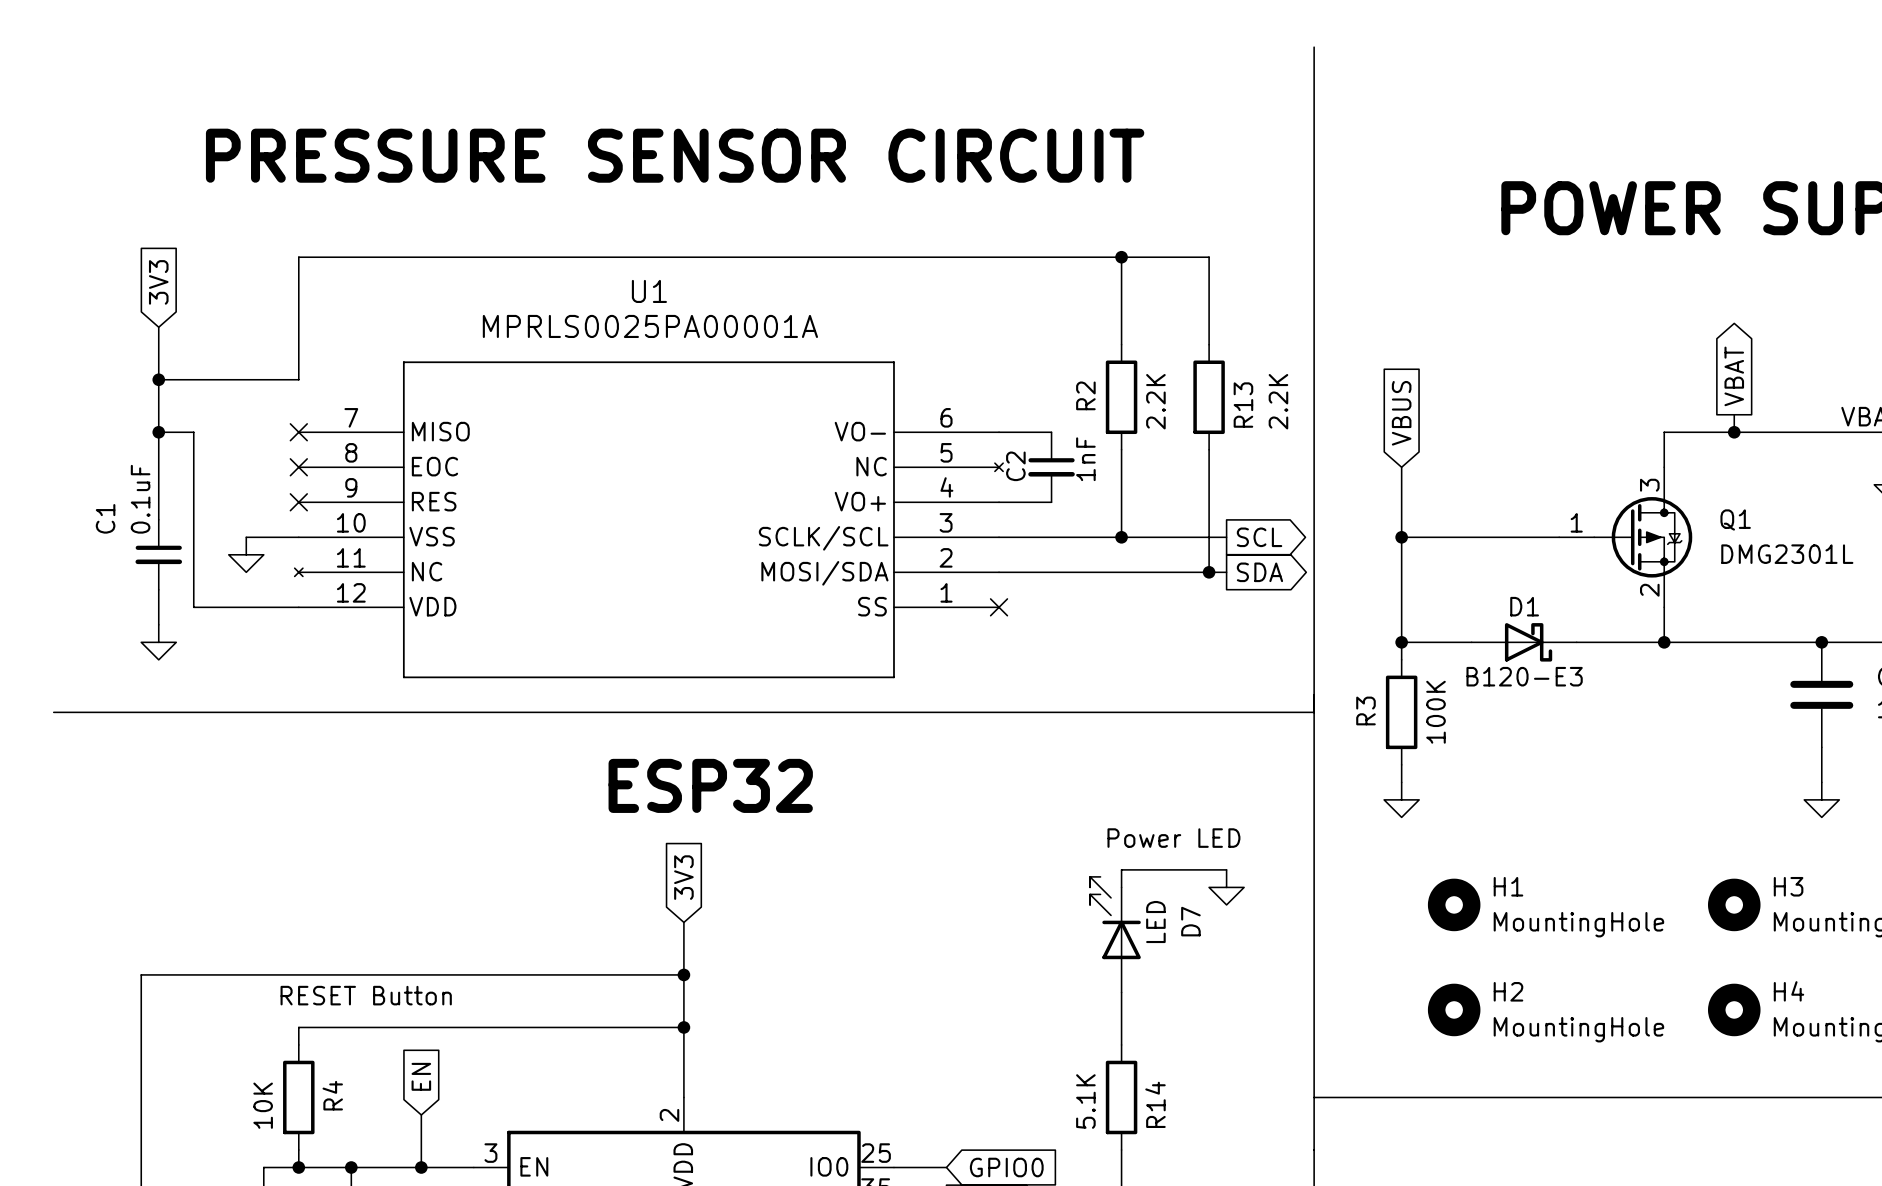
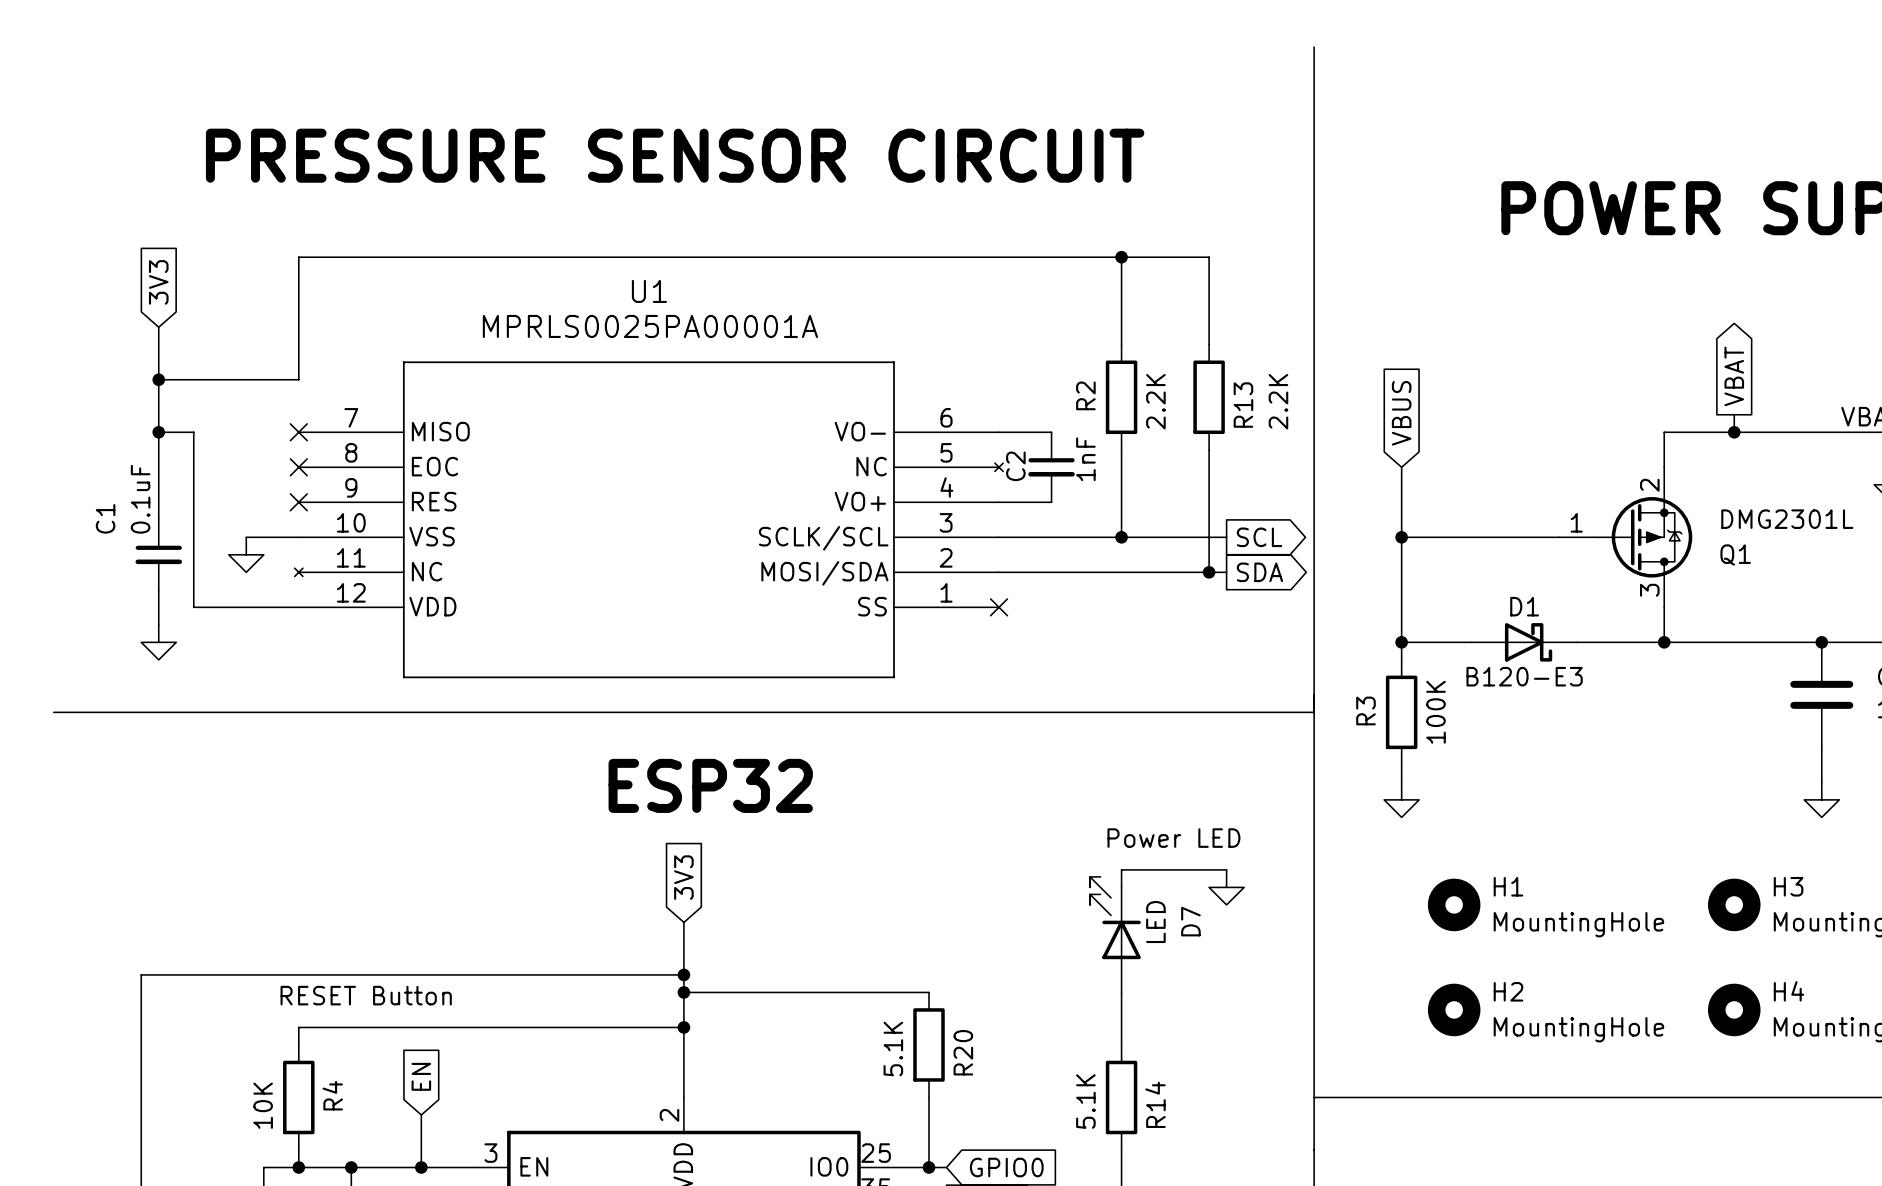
Q1 flip: as is (1643, 537) -> up-down (1643, 537)
wire: none -> (683, 992) (929, 992)
junction: none -> (683, 992)
R20: none -> 5.1K (929, 1044)
wire: none -> (929, 1097) (929, 1167)
junction: none -> (929, 1167)

